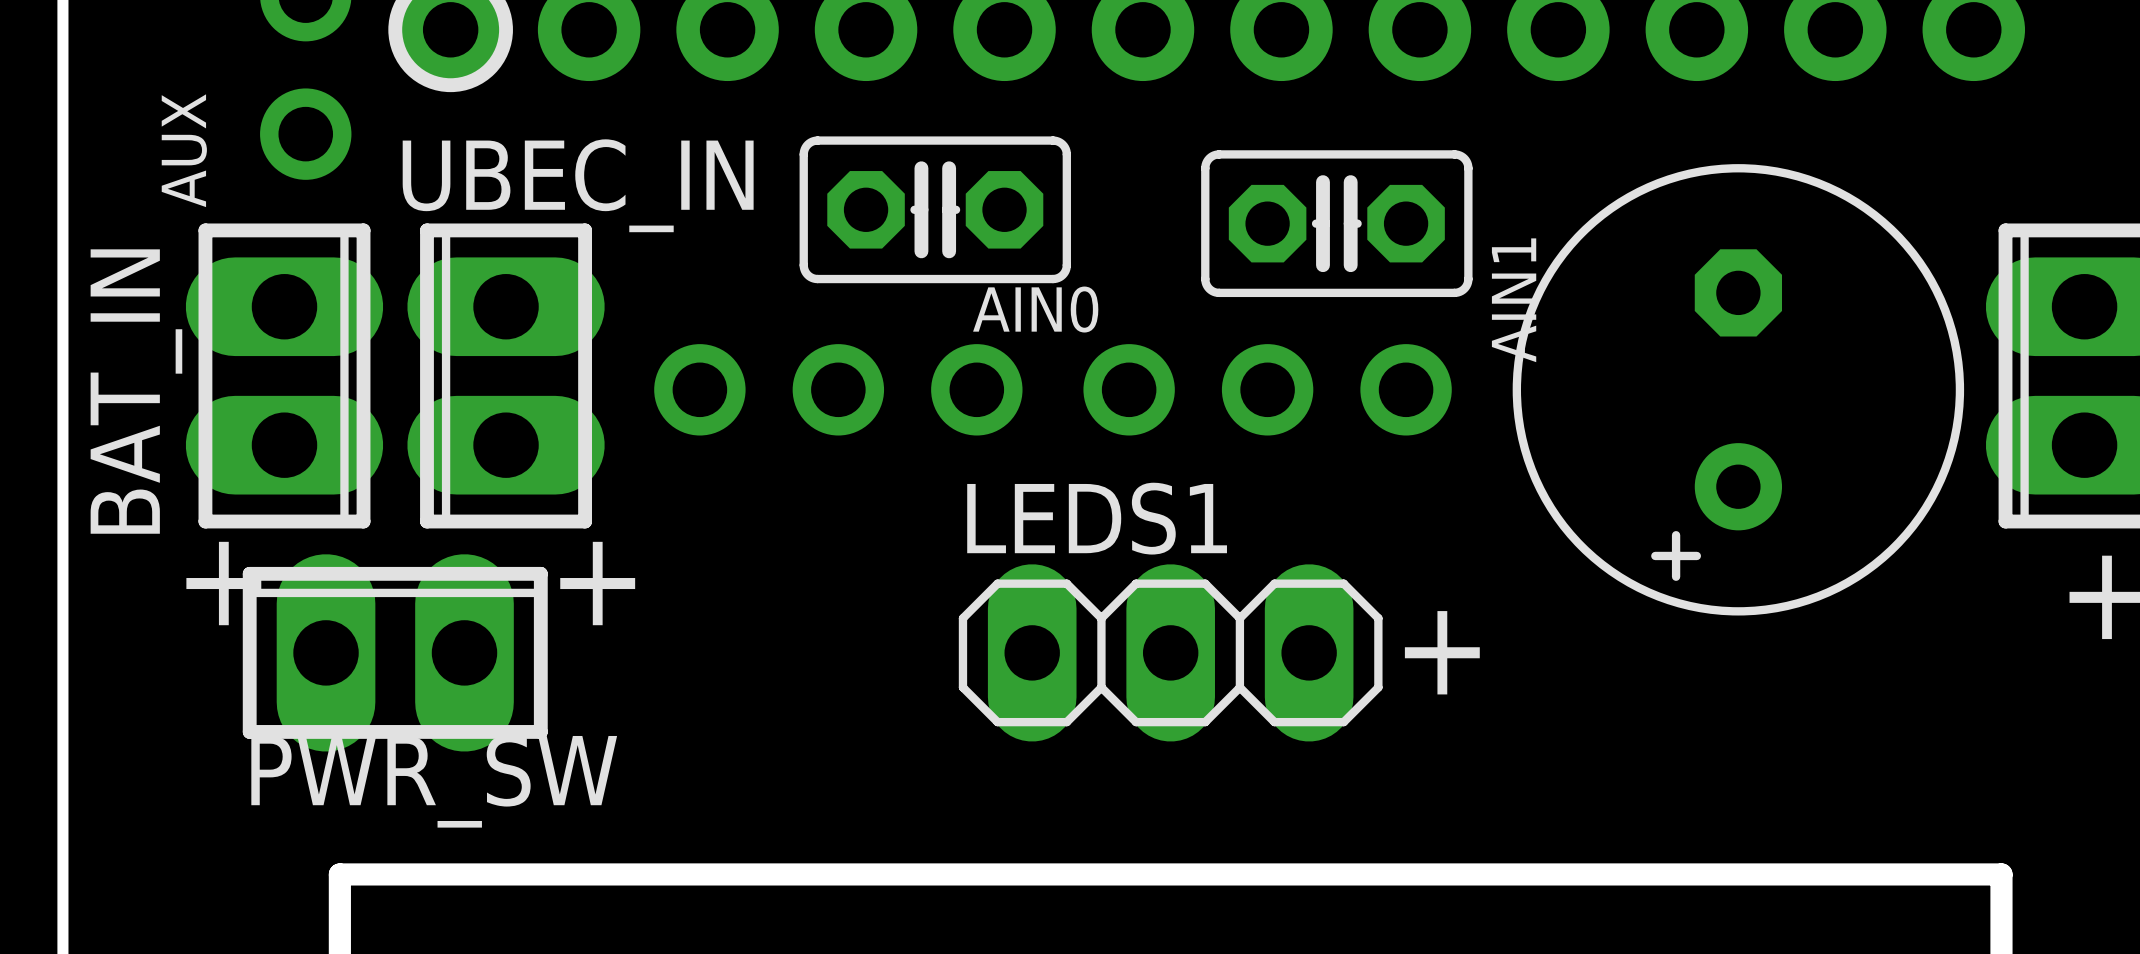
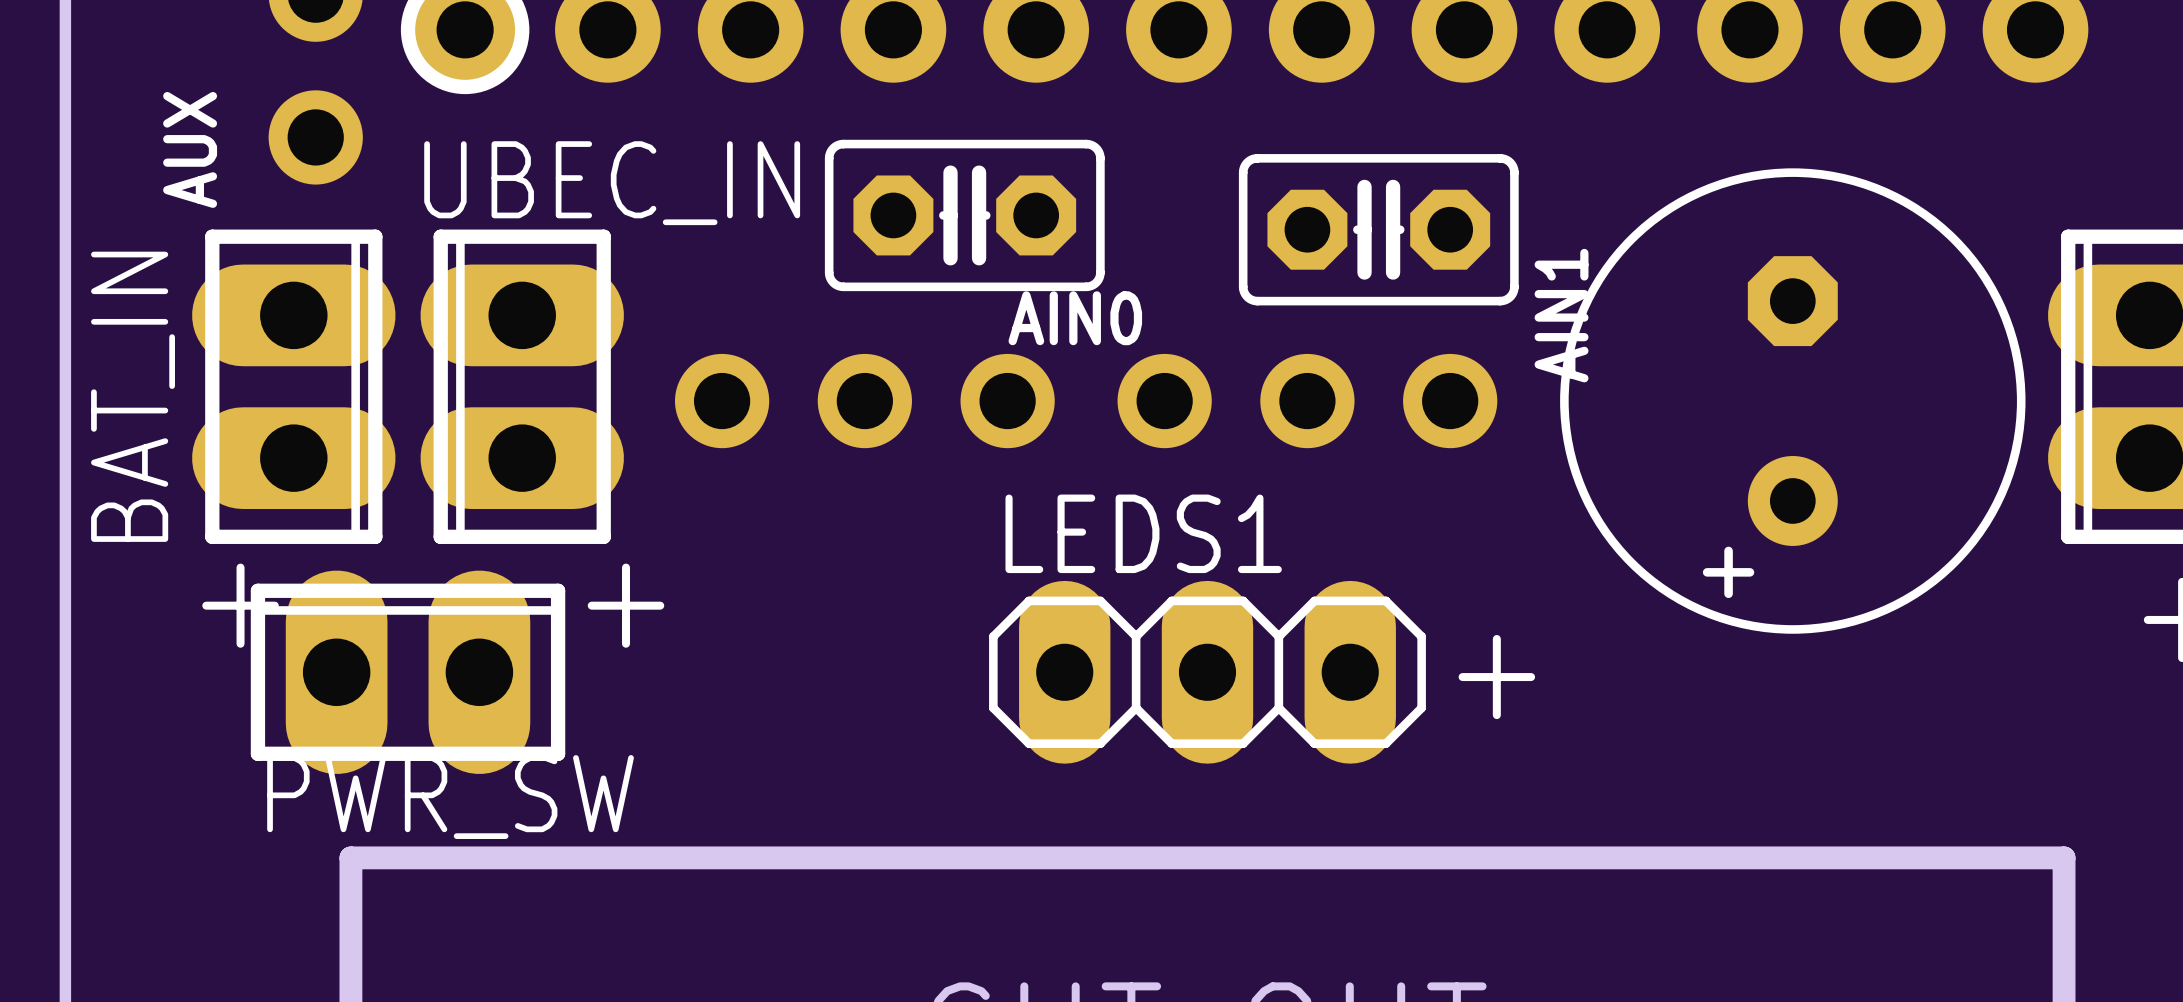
board edge: (339, 874) (2001, 874) -> (350, 900) (350, 857) (2064, 857) (2064, 900)

